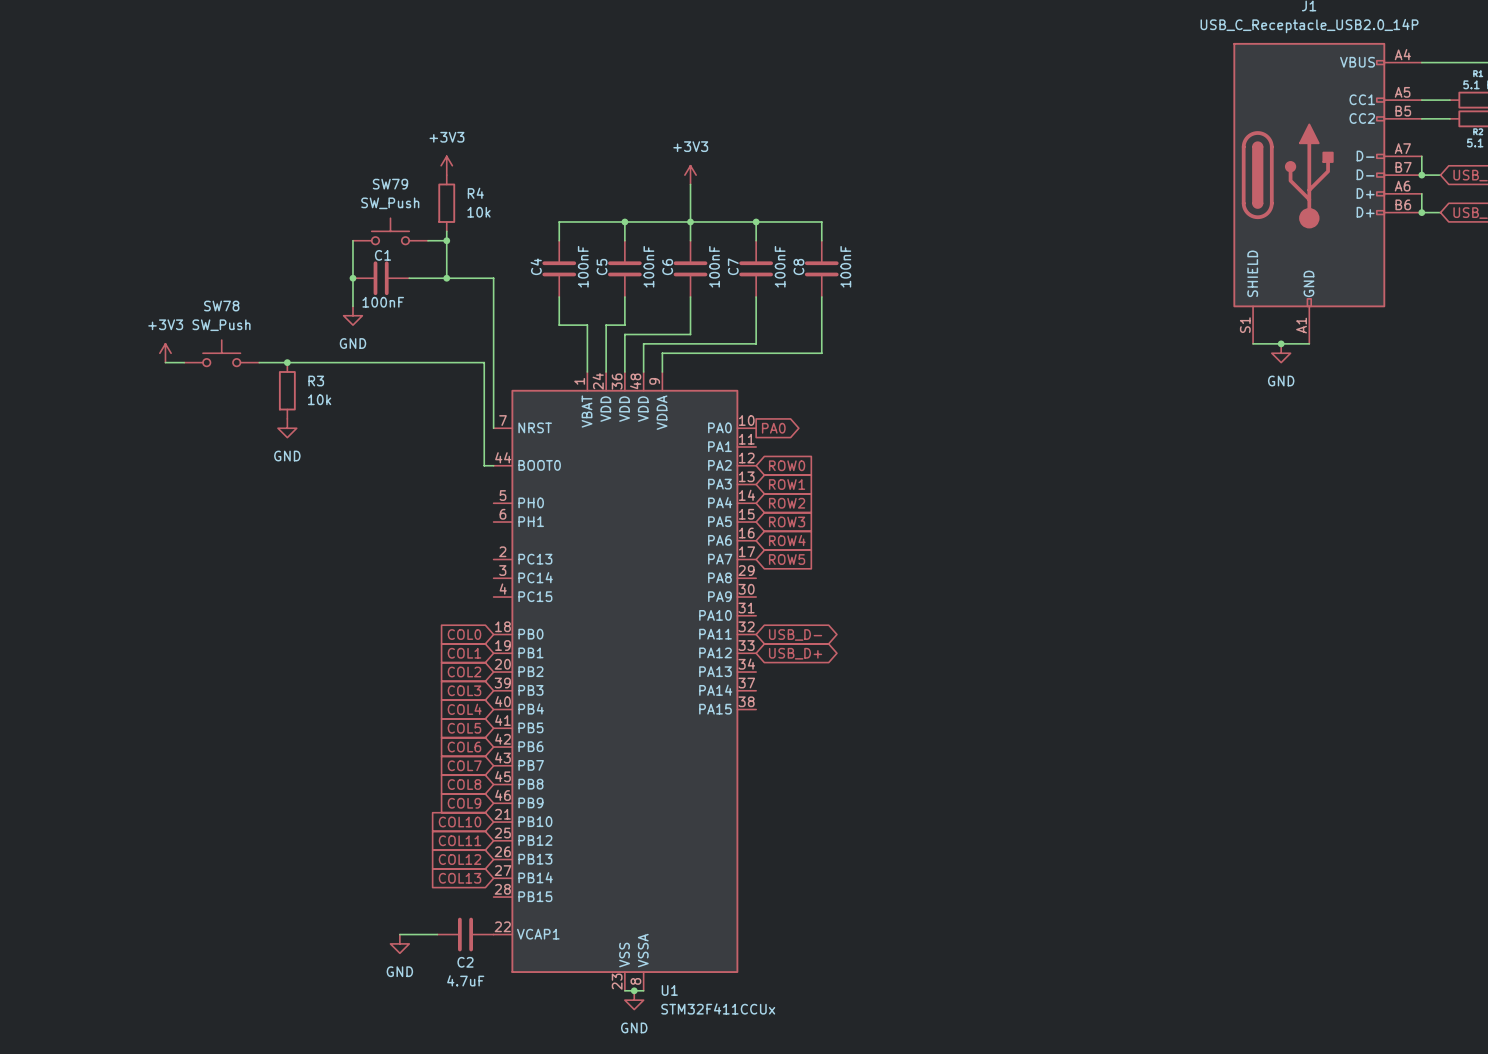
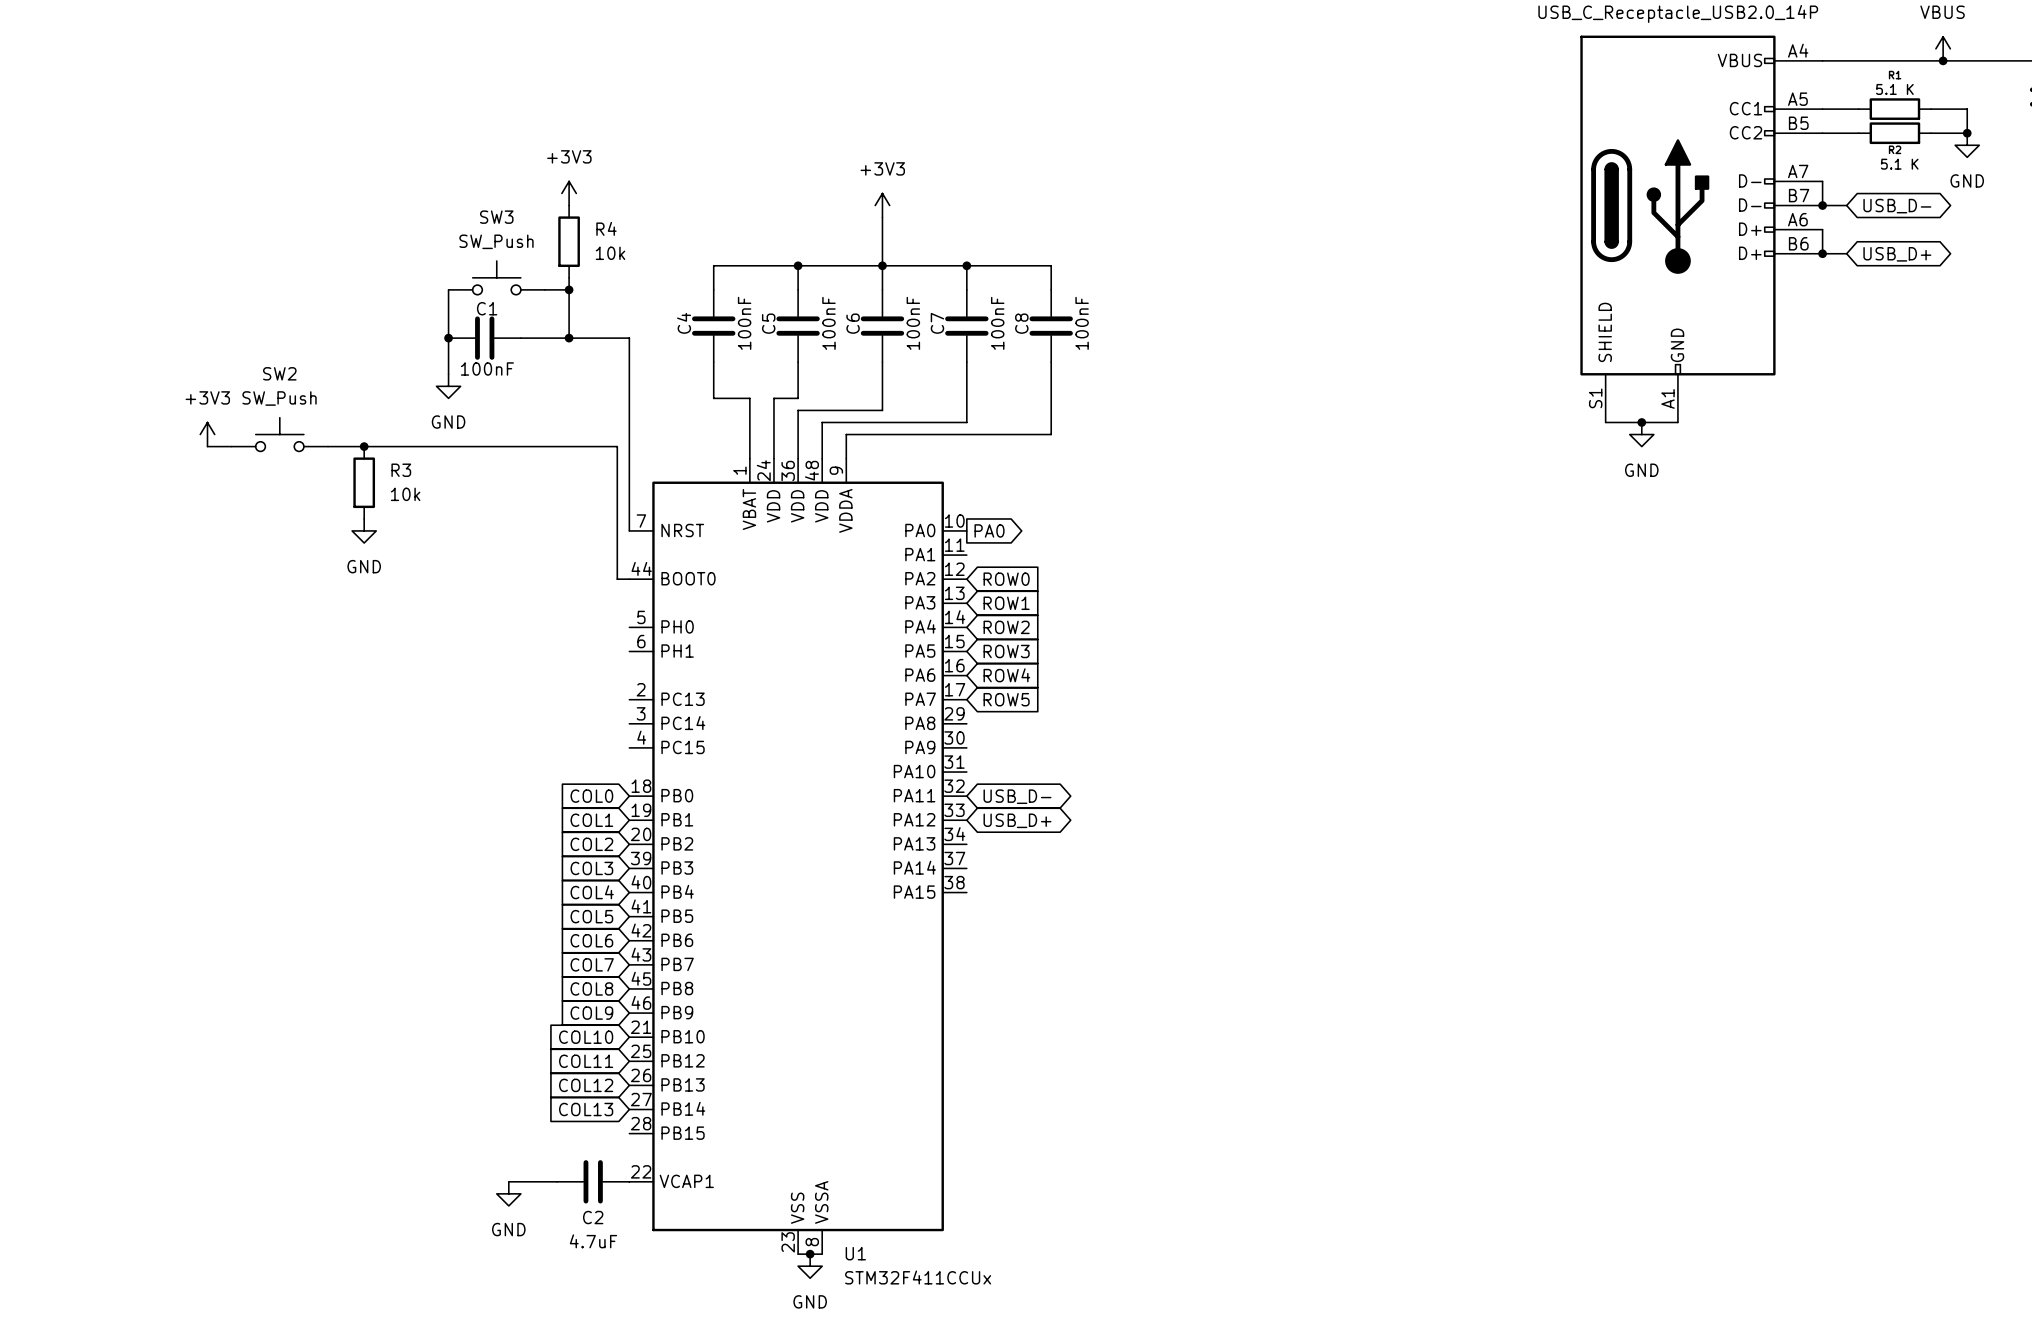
SW79 name: SW79 (390, 184) -> SW3 (496, 217)
SW78 name: SW78 (221, 306) -> SW2 (279, 373)

